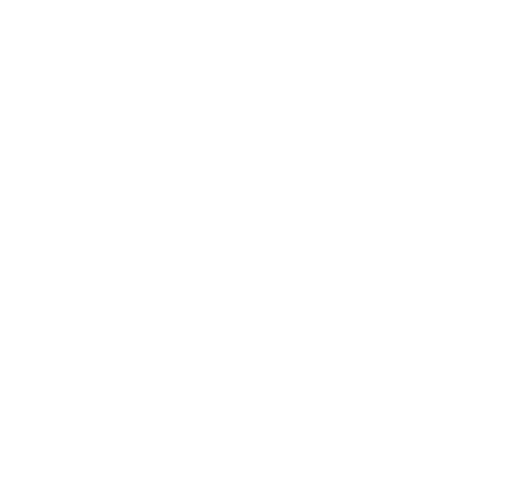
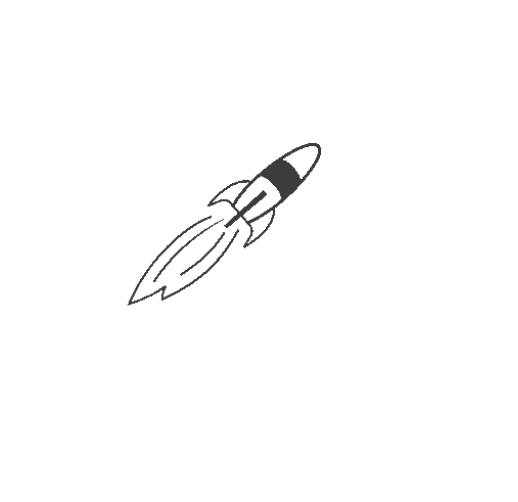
drawing: none -> [127, 143, 322, 306]

